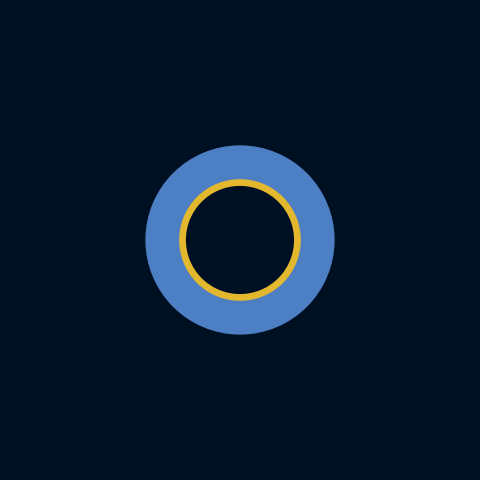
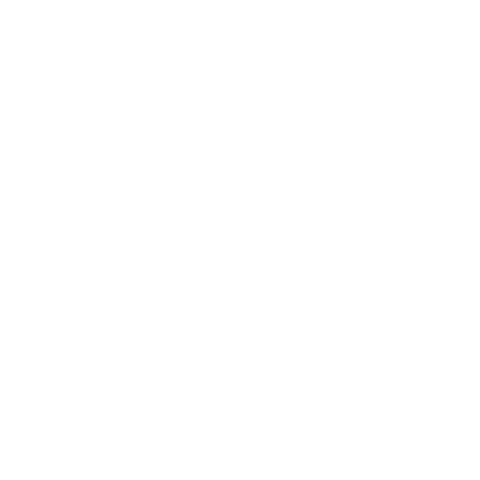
part: (239, 239) -> none

